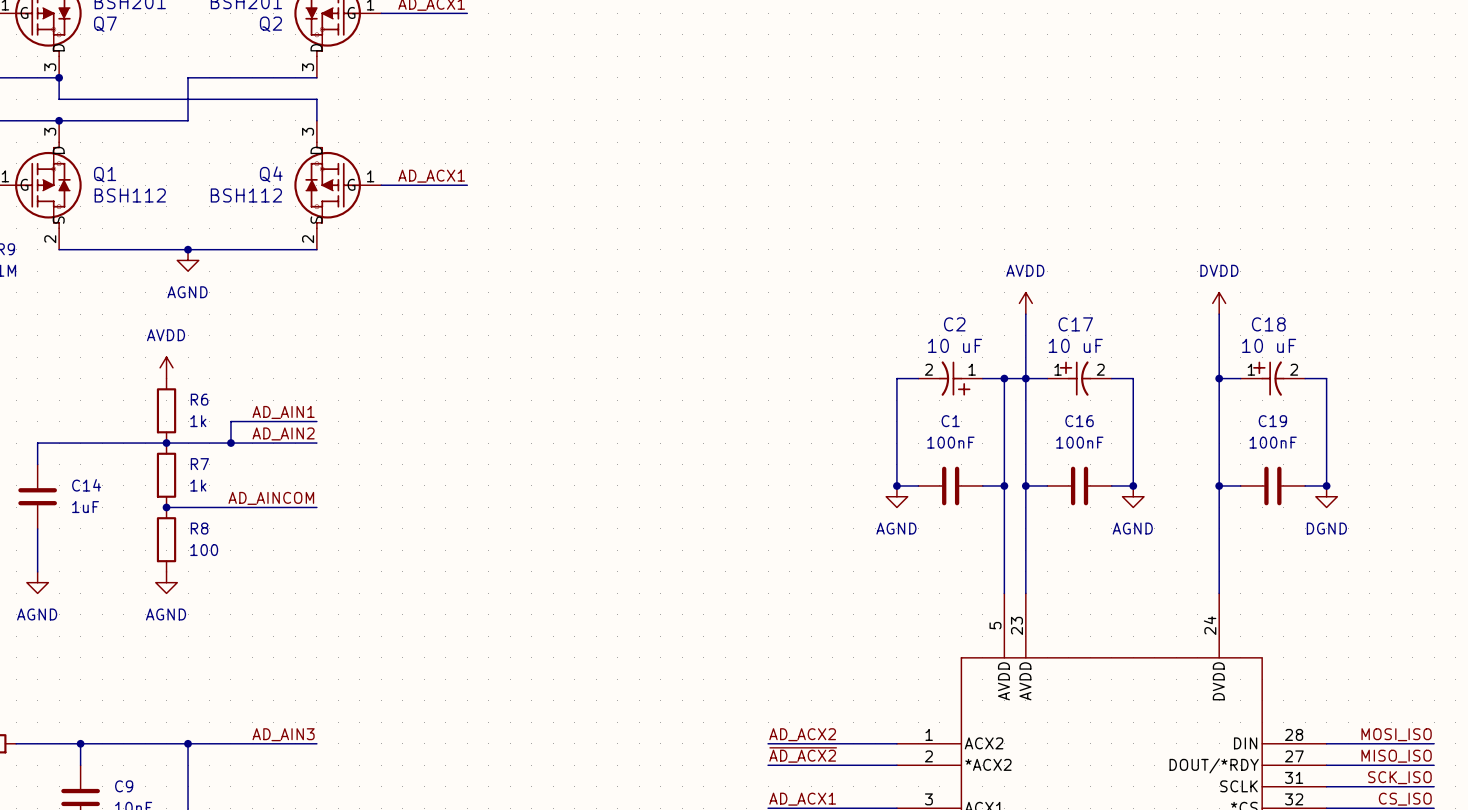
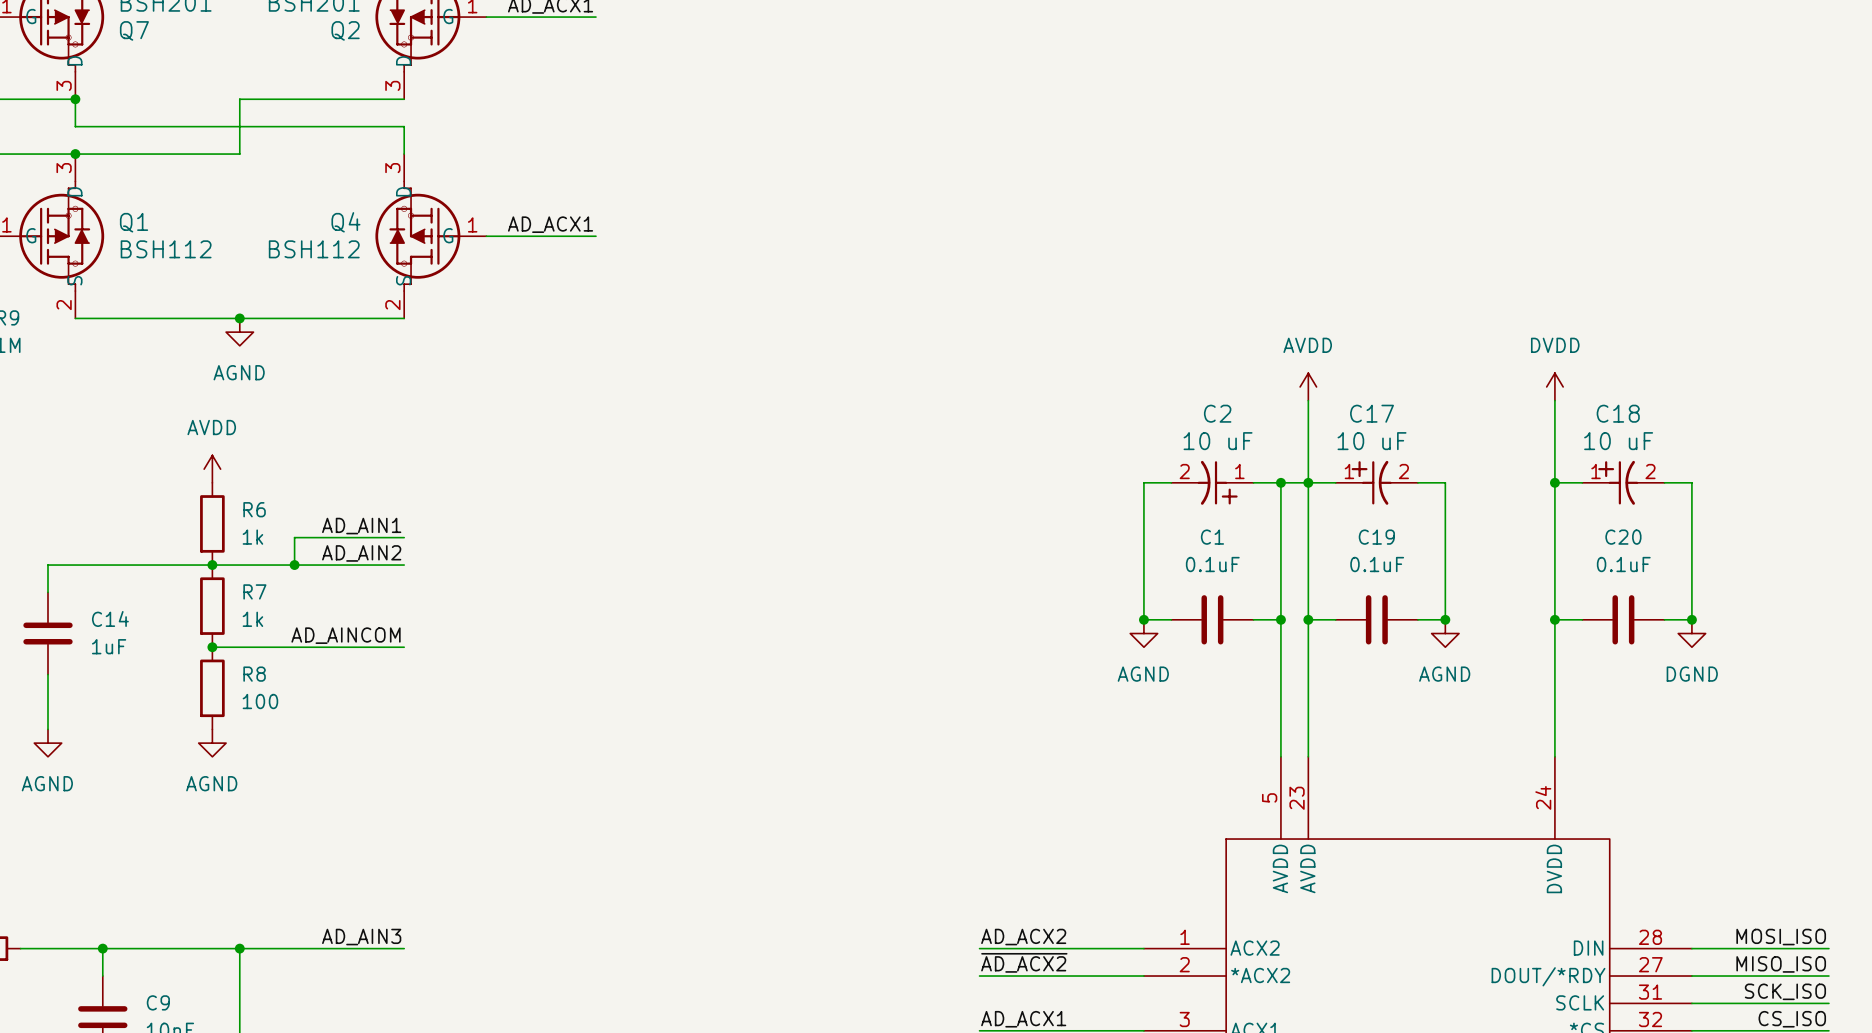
C16 name: C16 (1079, 421) -> C19 (1376, 537)
C19 name: C19 (1272, 421) -> C20 (1623, 537)
C1 value: 100nF (950, 442) -> 0.1uF (1212, 564)
C16 value: 100nF (1079, 442) -> 0.1uF (1377, 564)
C19 value: 100nF (1273, 442) -> 0.1uF (1623, 564)

